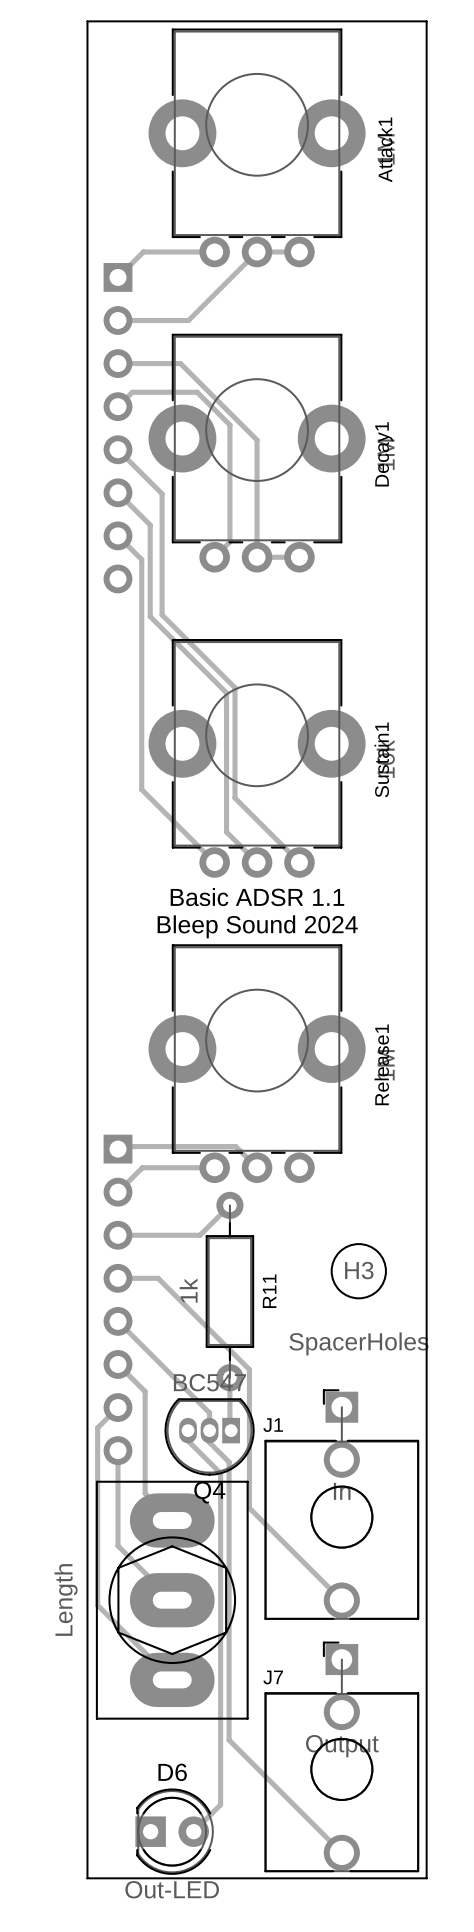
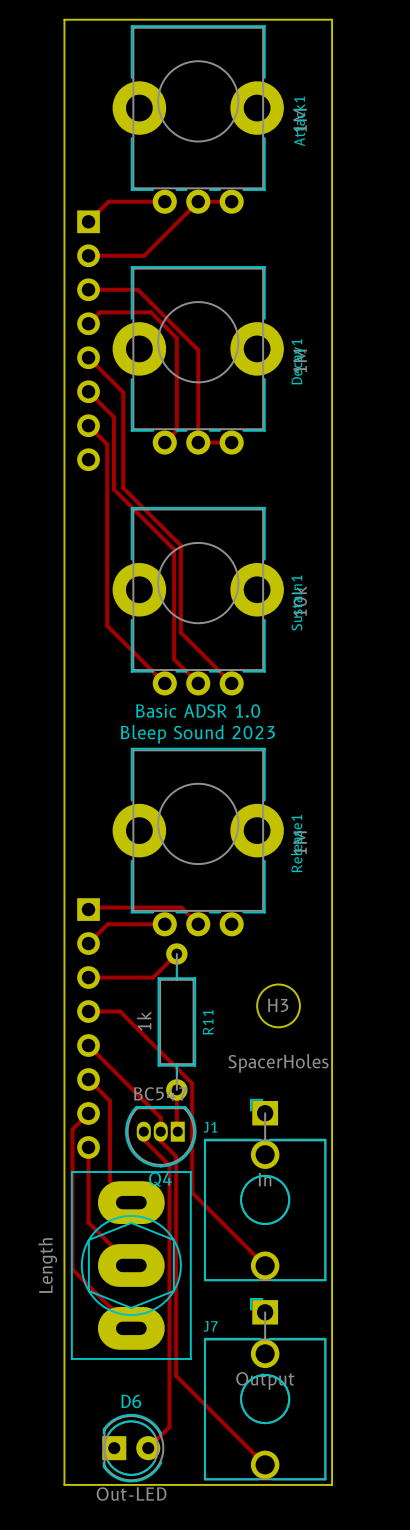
text: Basic ADSR 1.1 (257, 897) -> Basic ADSR 1.0 (198, 711)
text: Bleep Sound 2024 (257, 926) -> Bleep Sound 2023 (197, 734)

